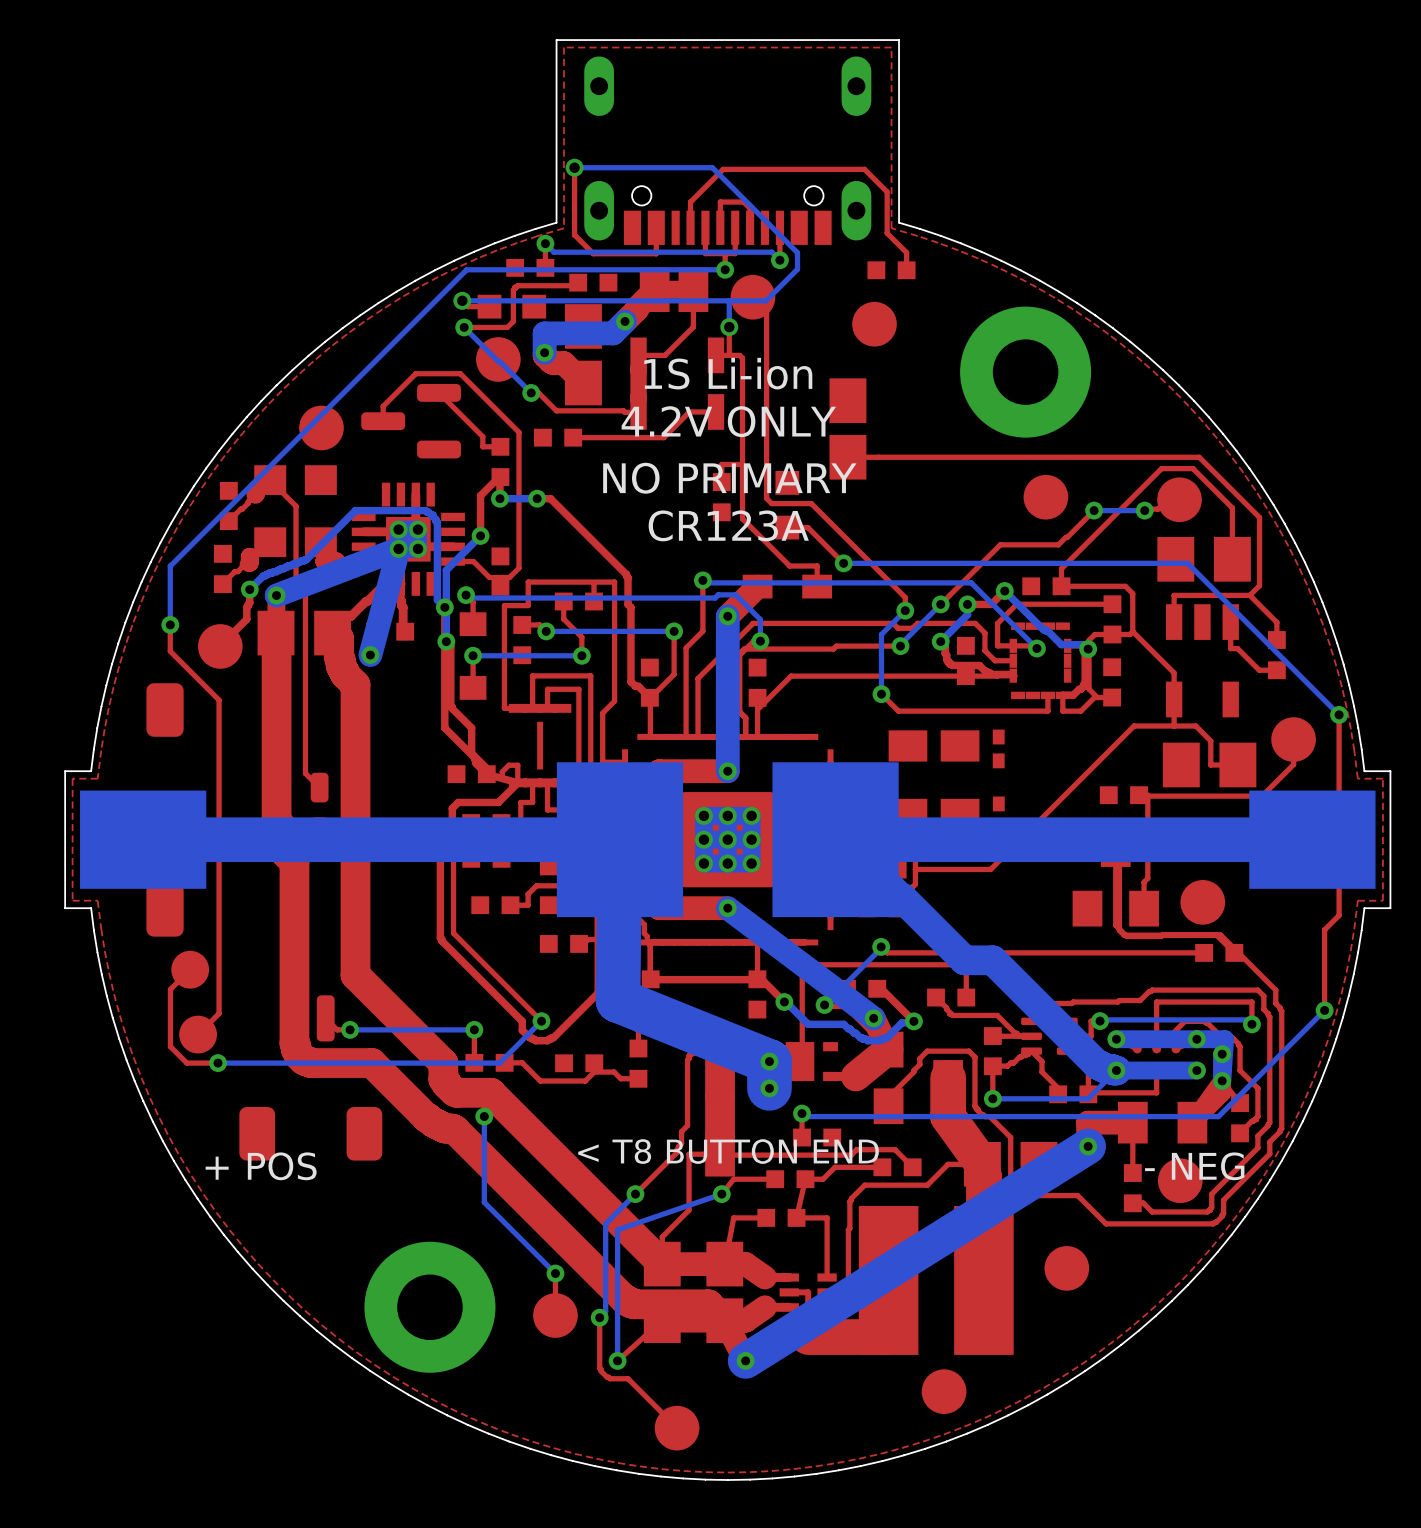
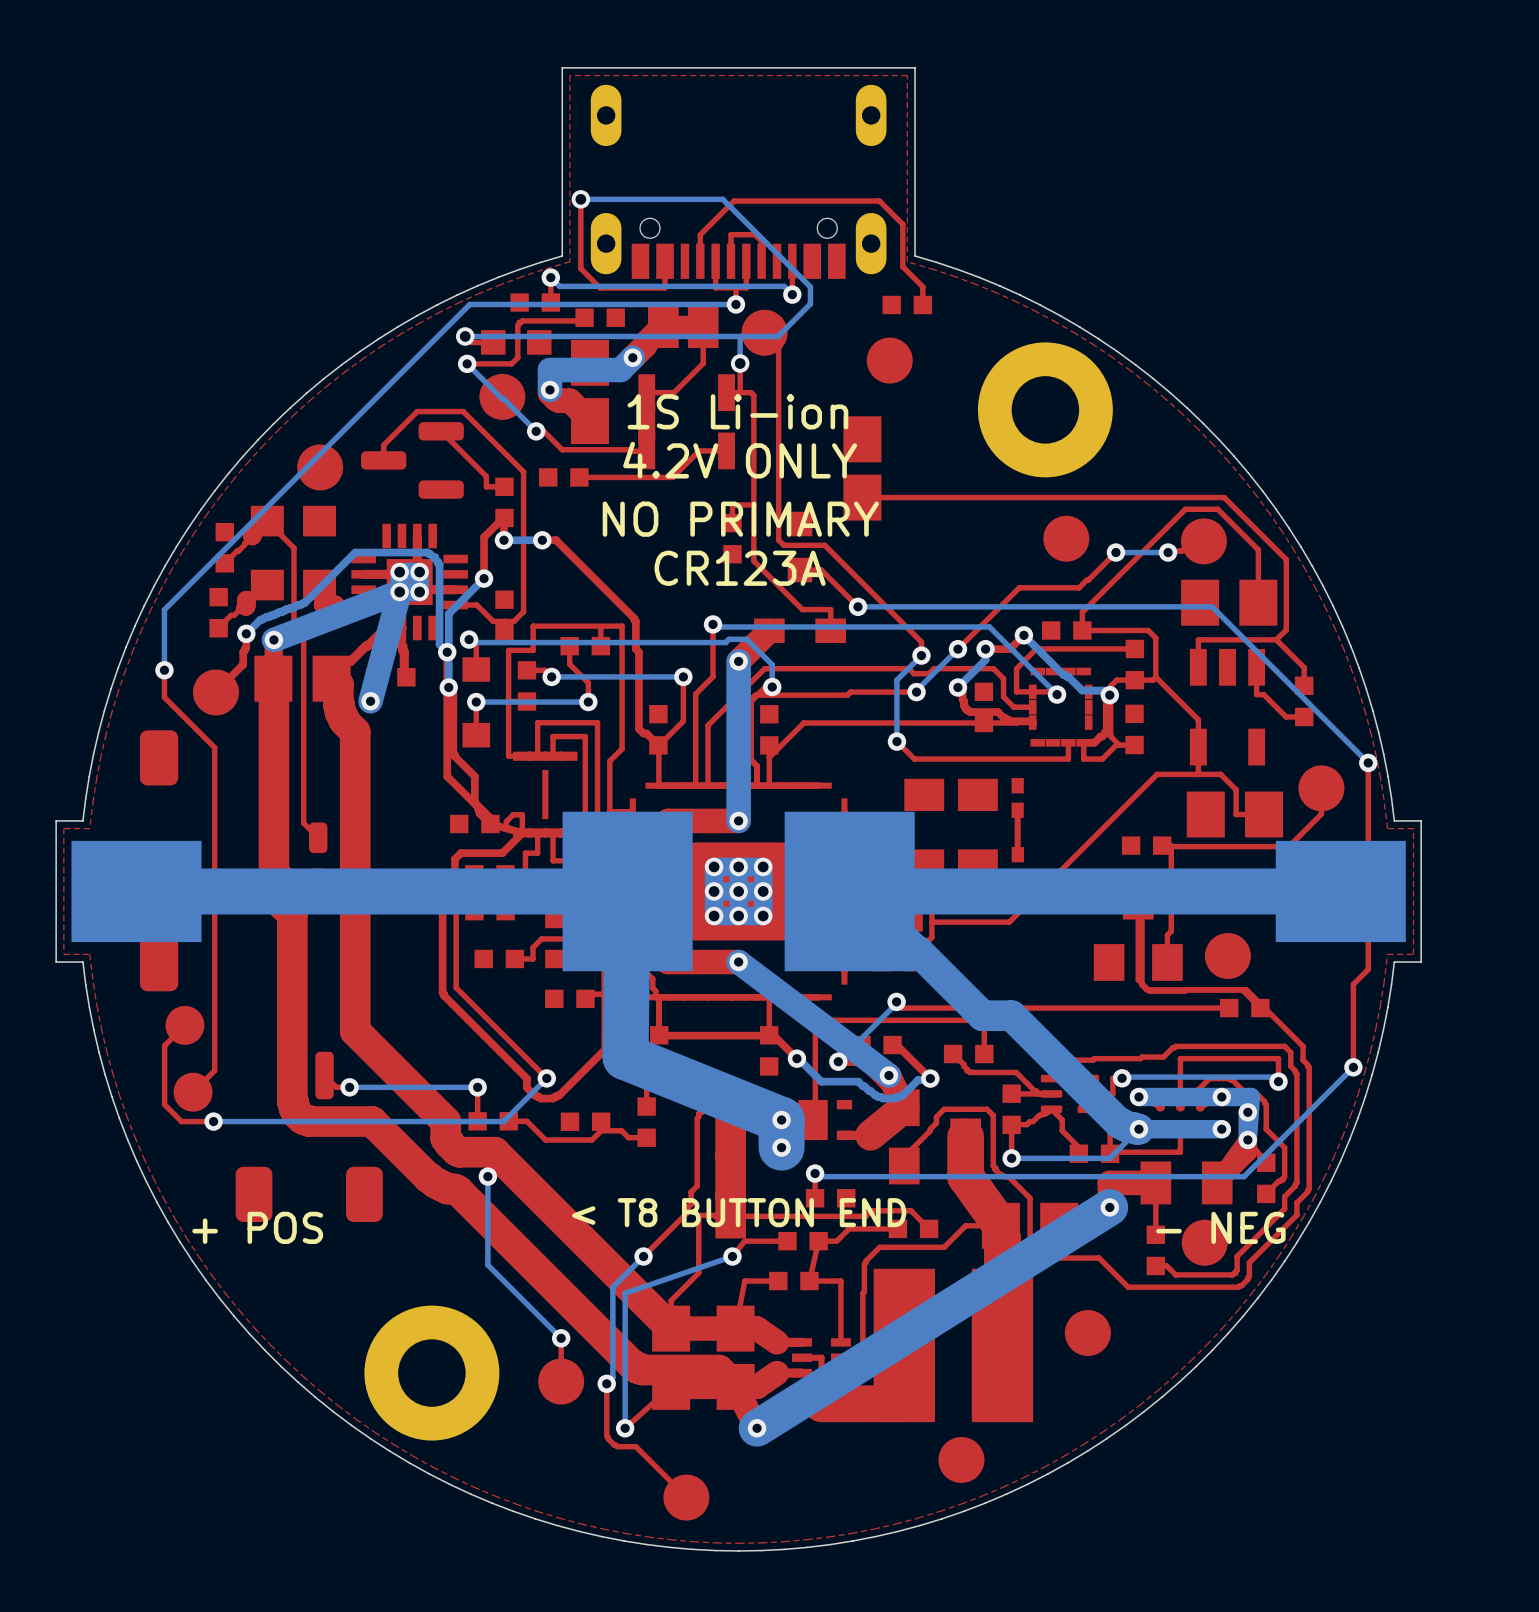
top track: none -> (1017, 810) (1017, 854)

